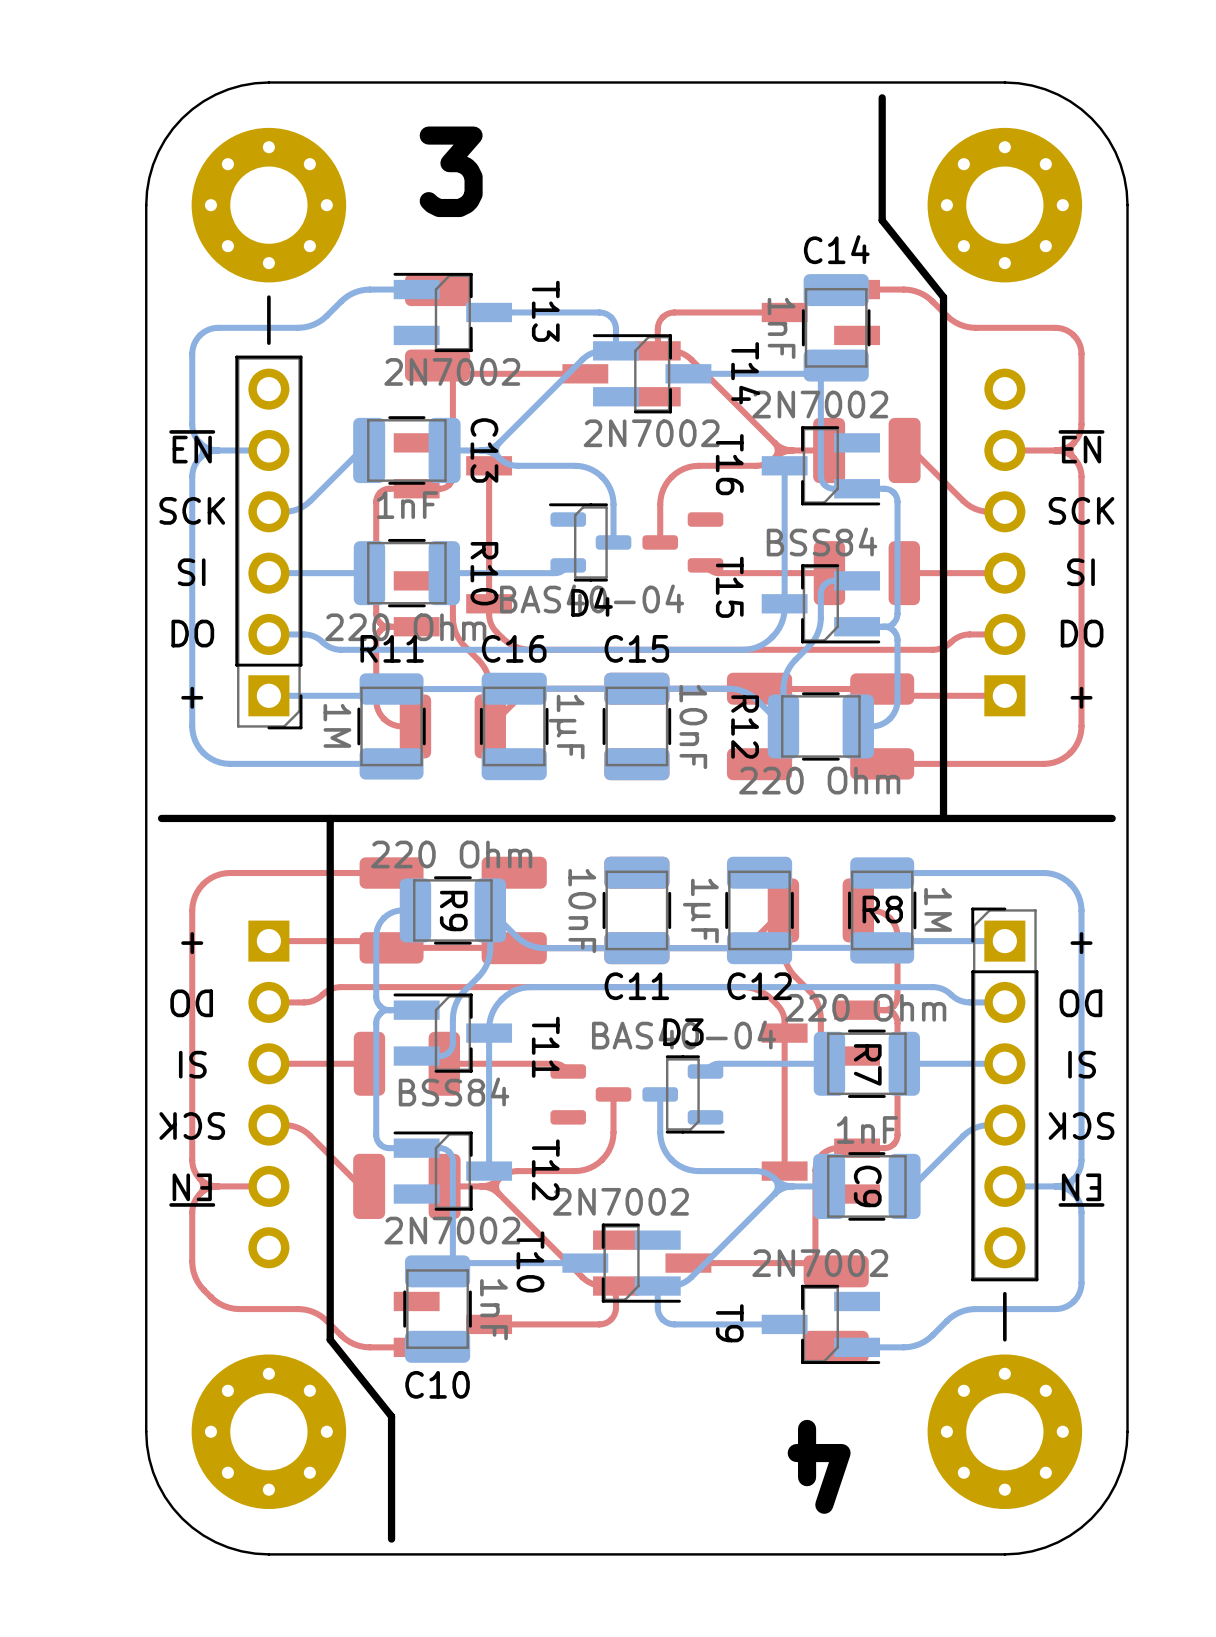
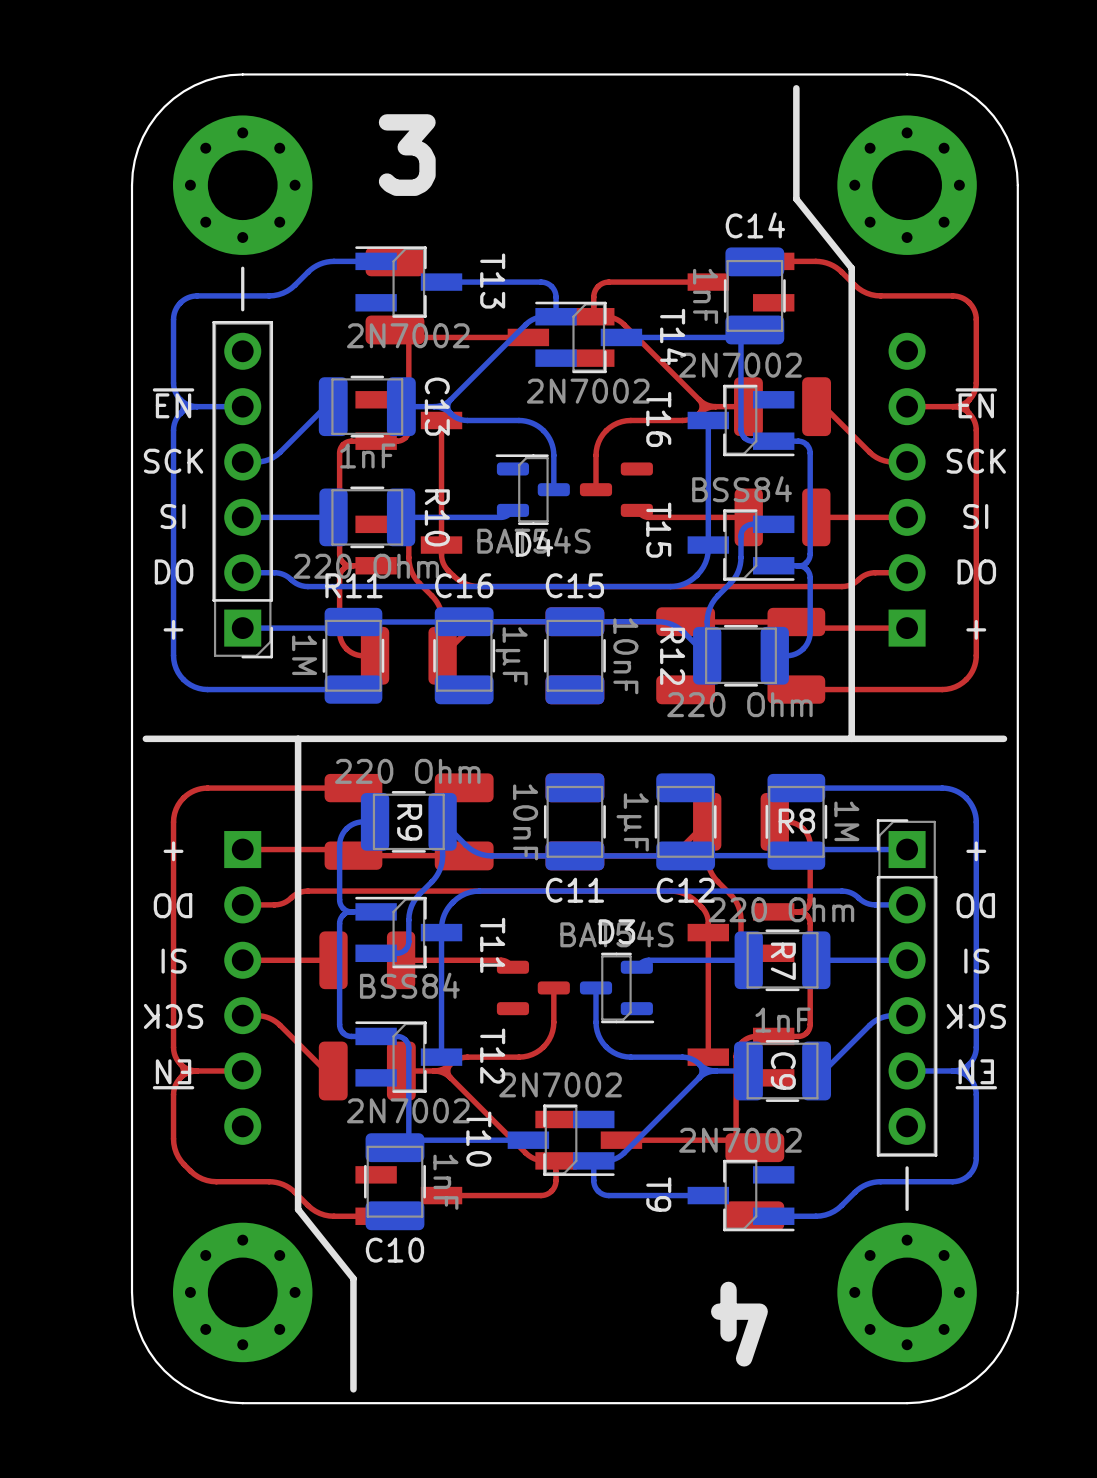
D4 value: BAS40-04 (592, 598) -> BAT54S (533, 540)
D3 value: BAS40-04 (684, 1035) -> BAT54S (616, 934)

